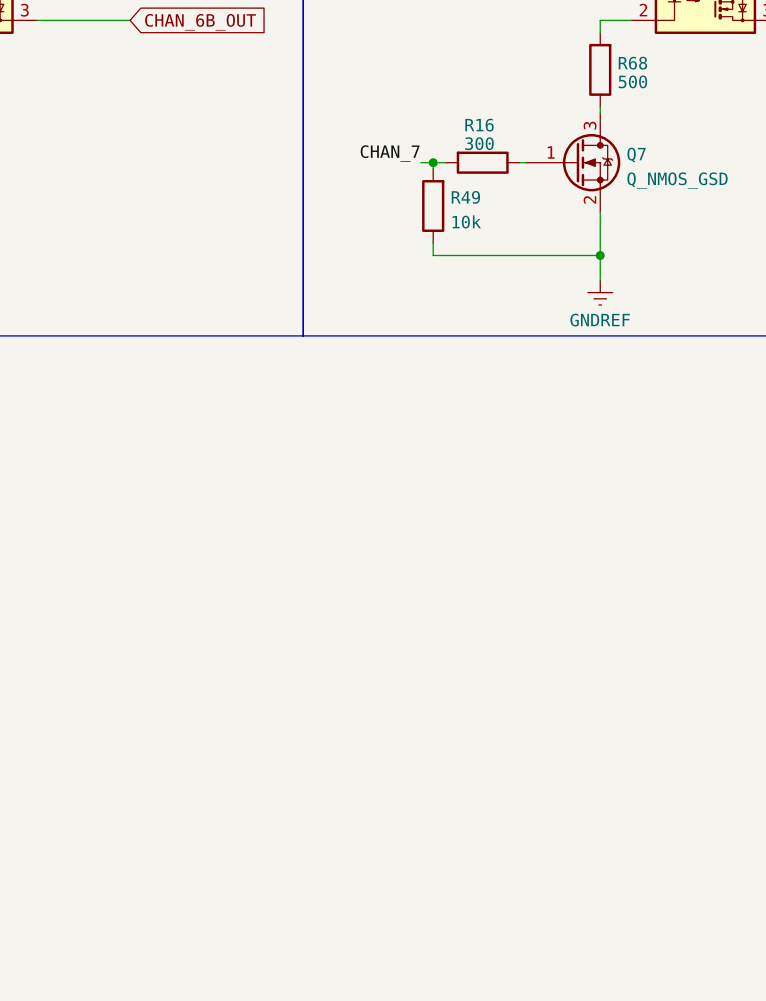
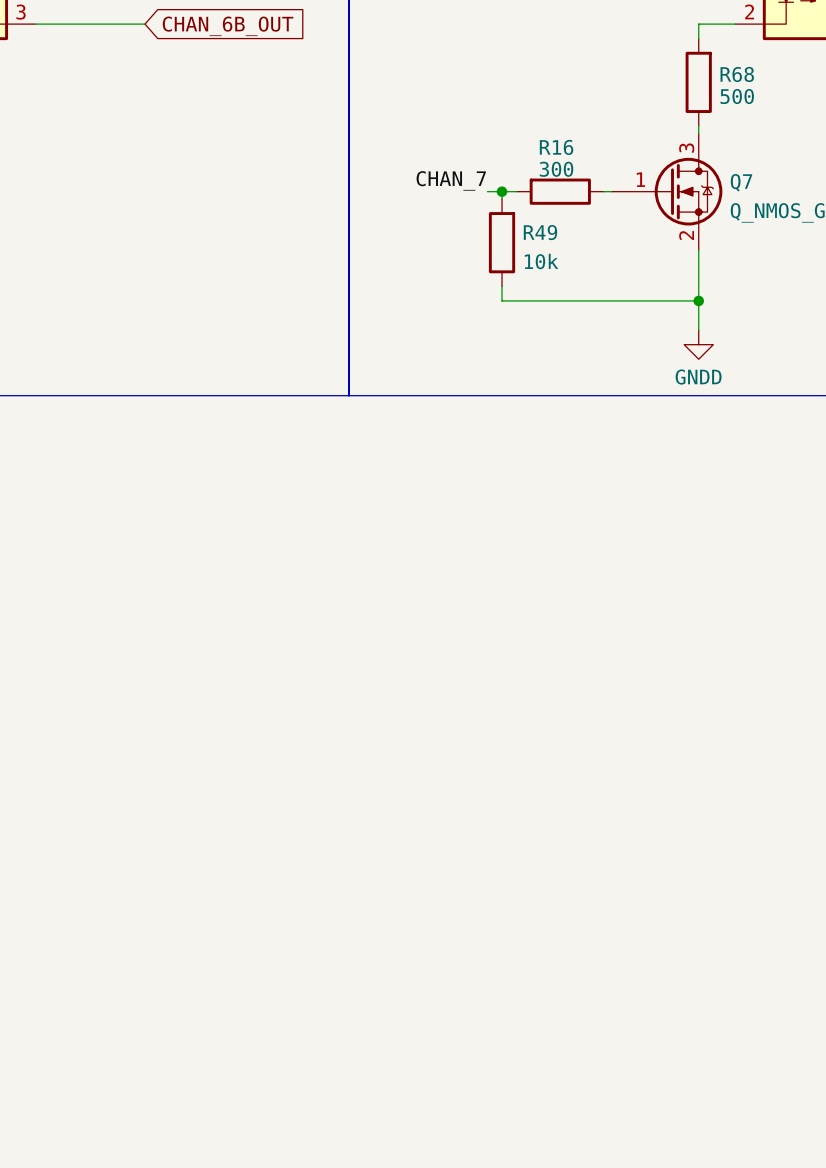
power symbol: GNDREF (600, 292) -> GNDD (698, 344)

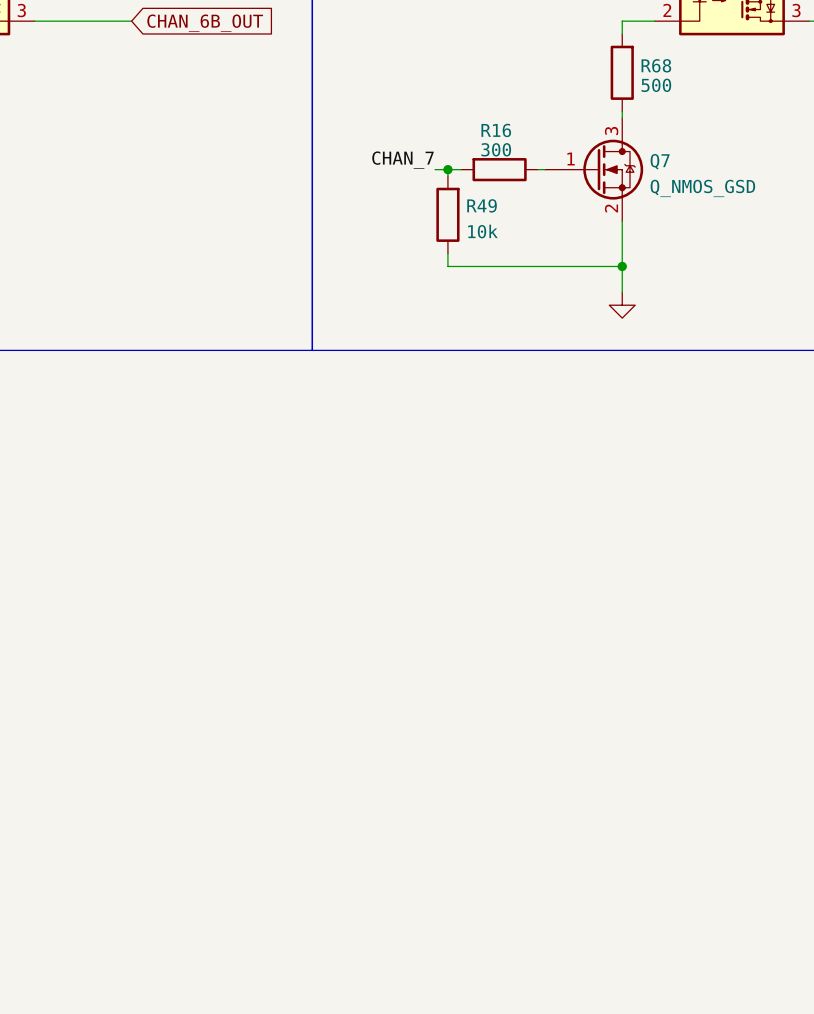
power symbol text: GNDD (698, 377) -> none

